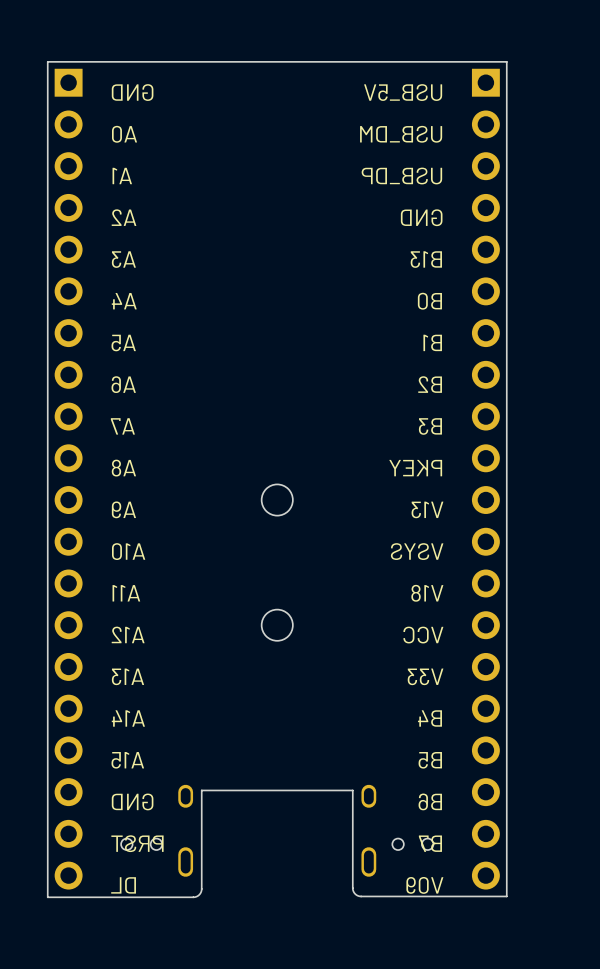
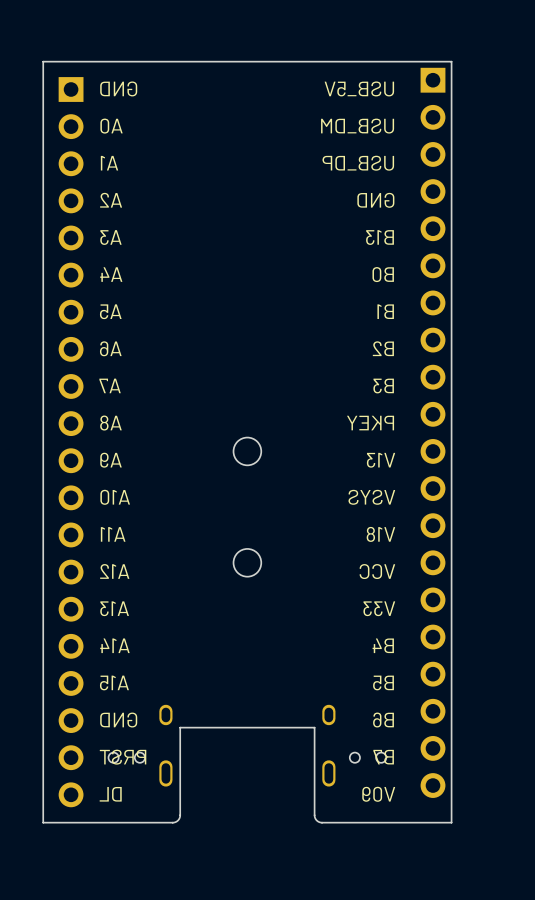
part position: (68, 479) -> (71, 442)
board edge: (352, 810) (352, 790) (201, 790) (201, 810) -> (314, 727) (180, 727)
board edge: (201, 888) (199, 894) (193, 897) (47, 897) -> (180, 797) (179, 817) (177, 821) (172, 822) (43, 822) (43, 804)
board edge: (352, 888) (355, 894) (361, 896) (506, 896) -> (314, 796) (314, 817) (317, 821) (322, 822) (451, 822) (451, 804)

